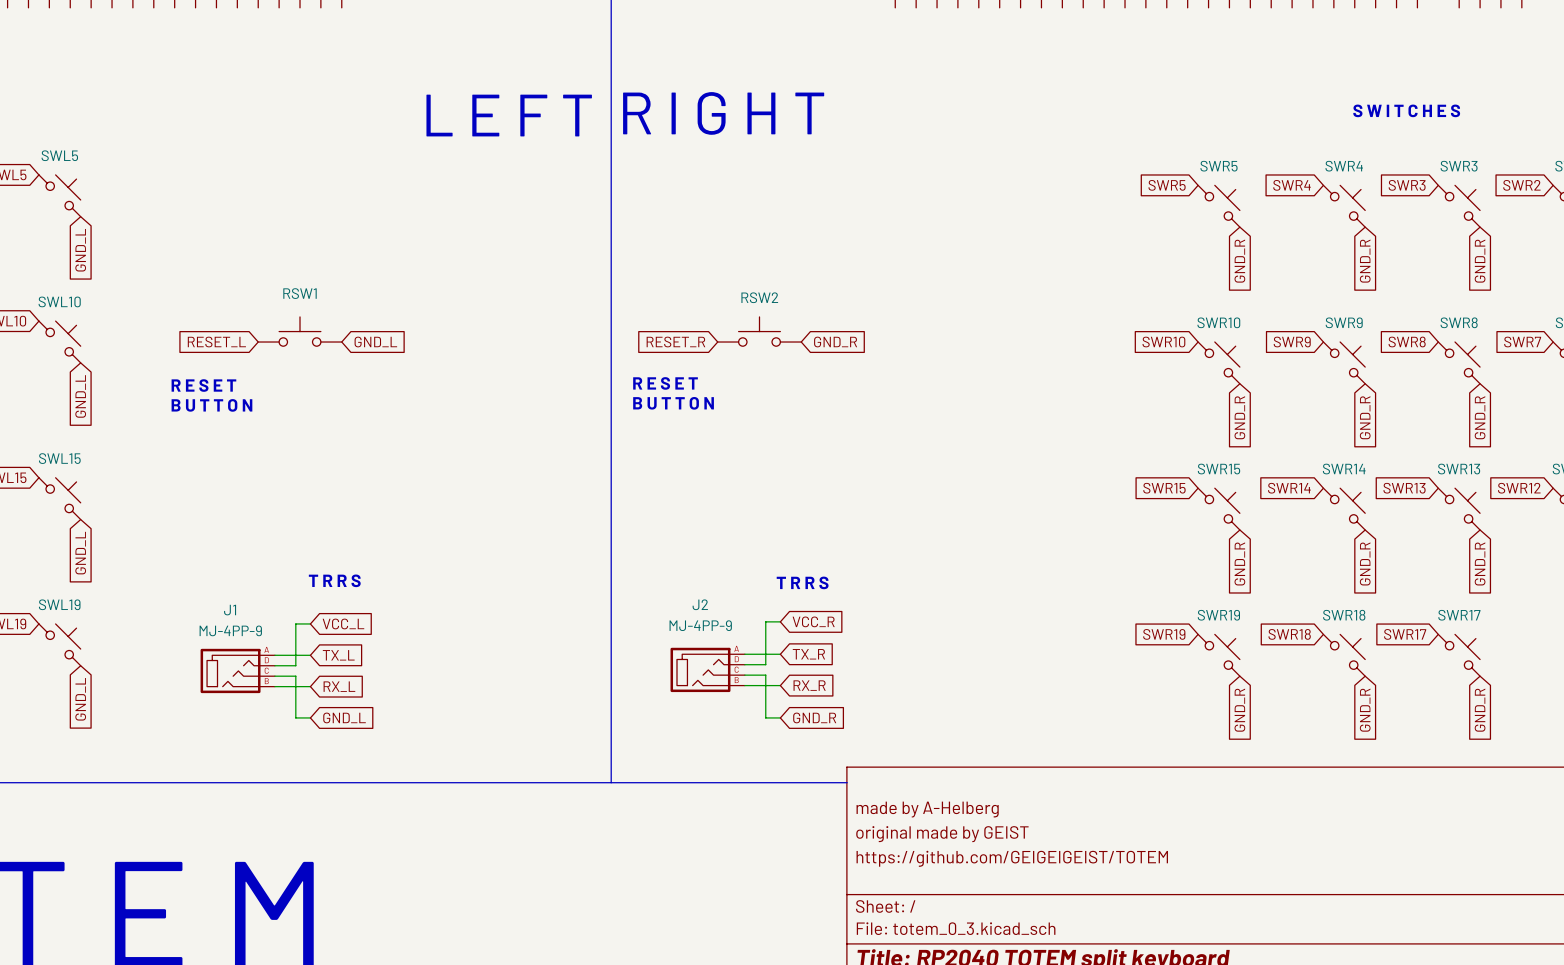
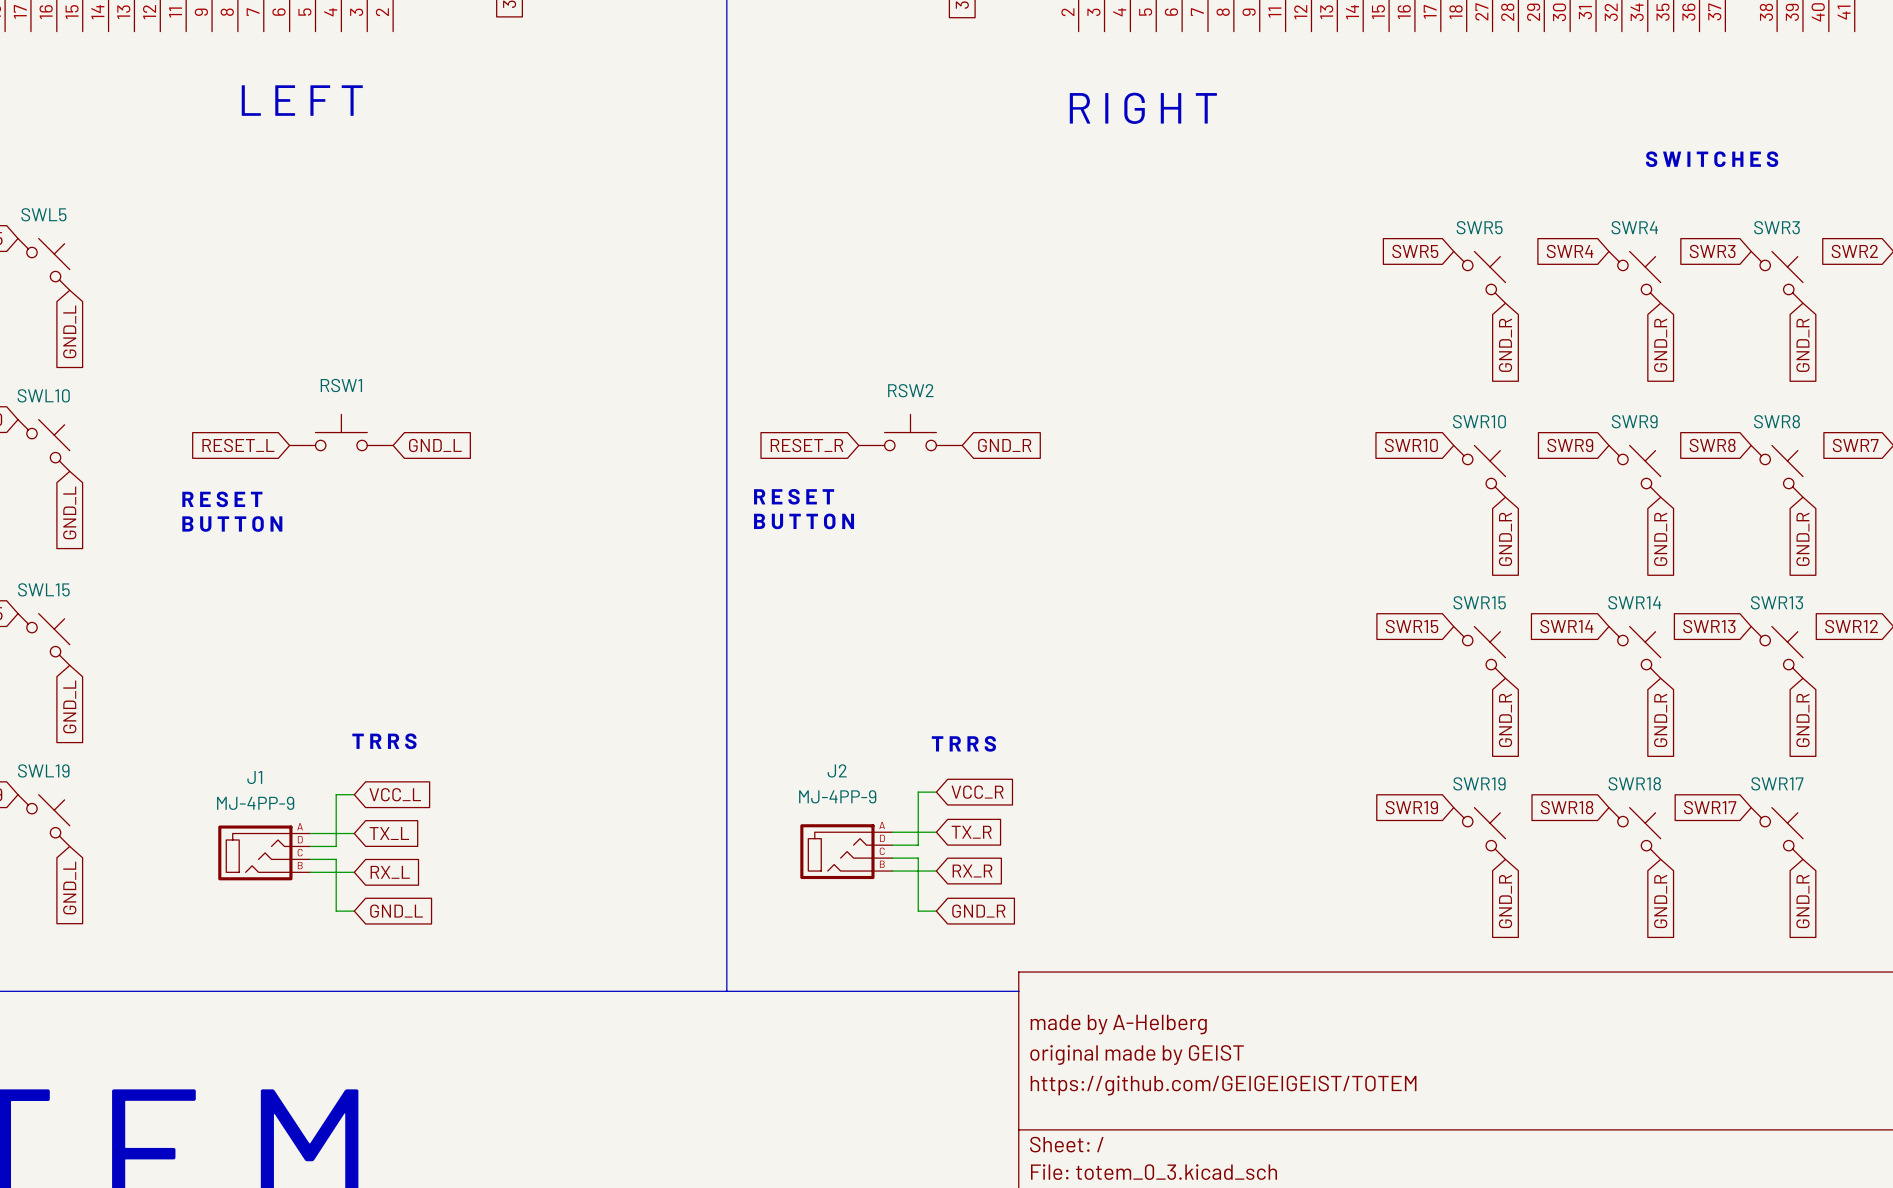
text: none -> L E F T (302, 100)
text: none -> R I G H T (1143, 108)
text: R I G H T (723, 113) -> none
text: L E F T (509, 115) -> none

